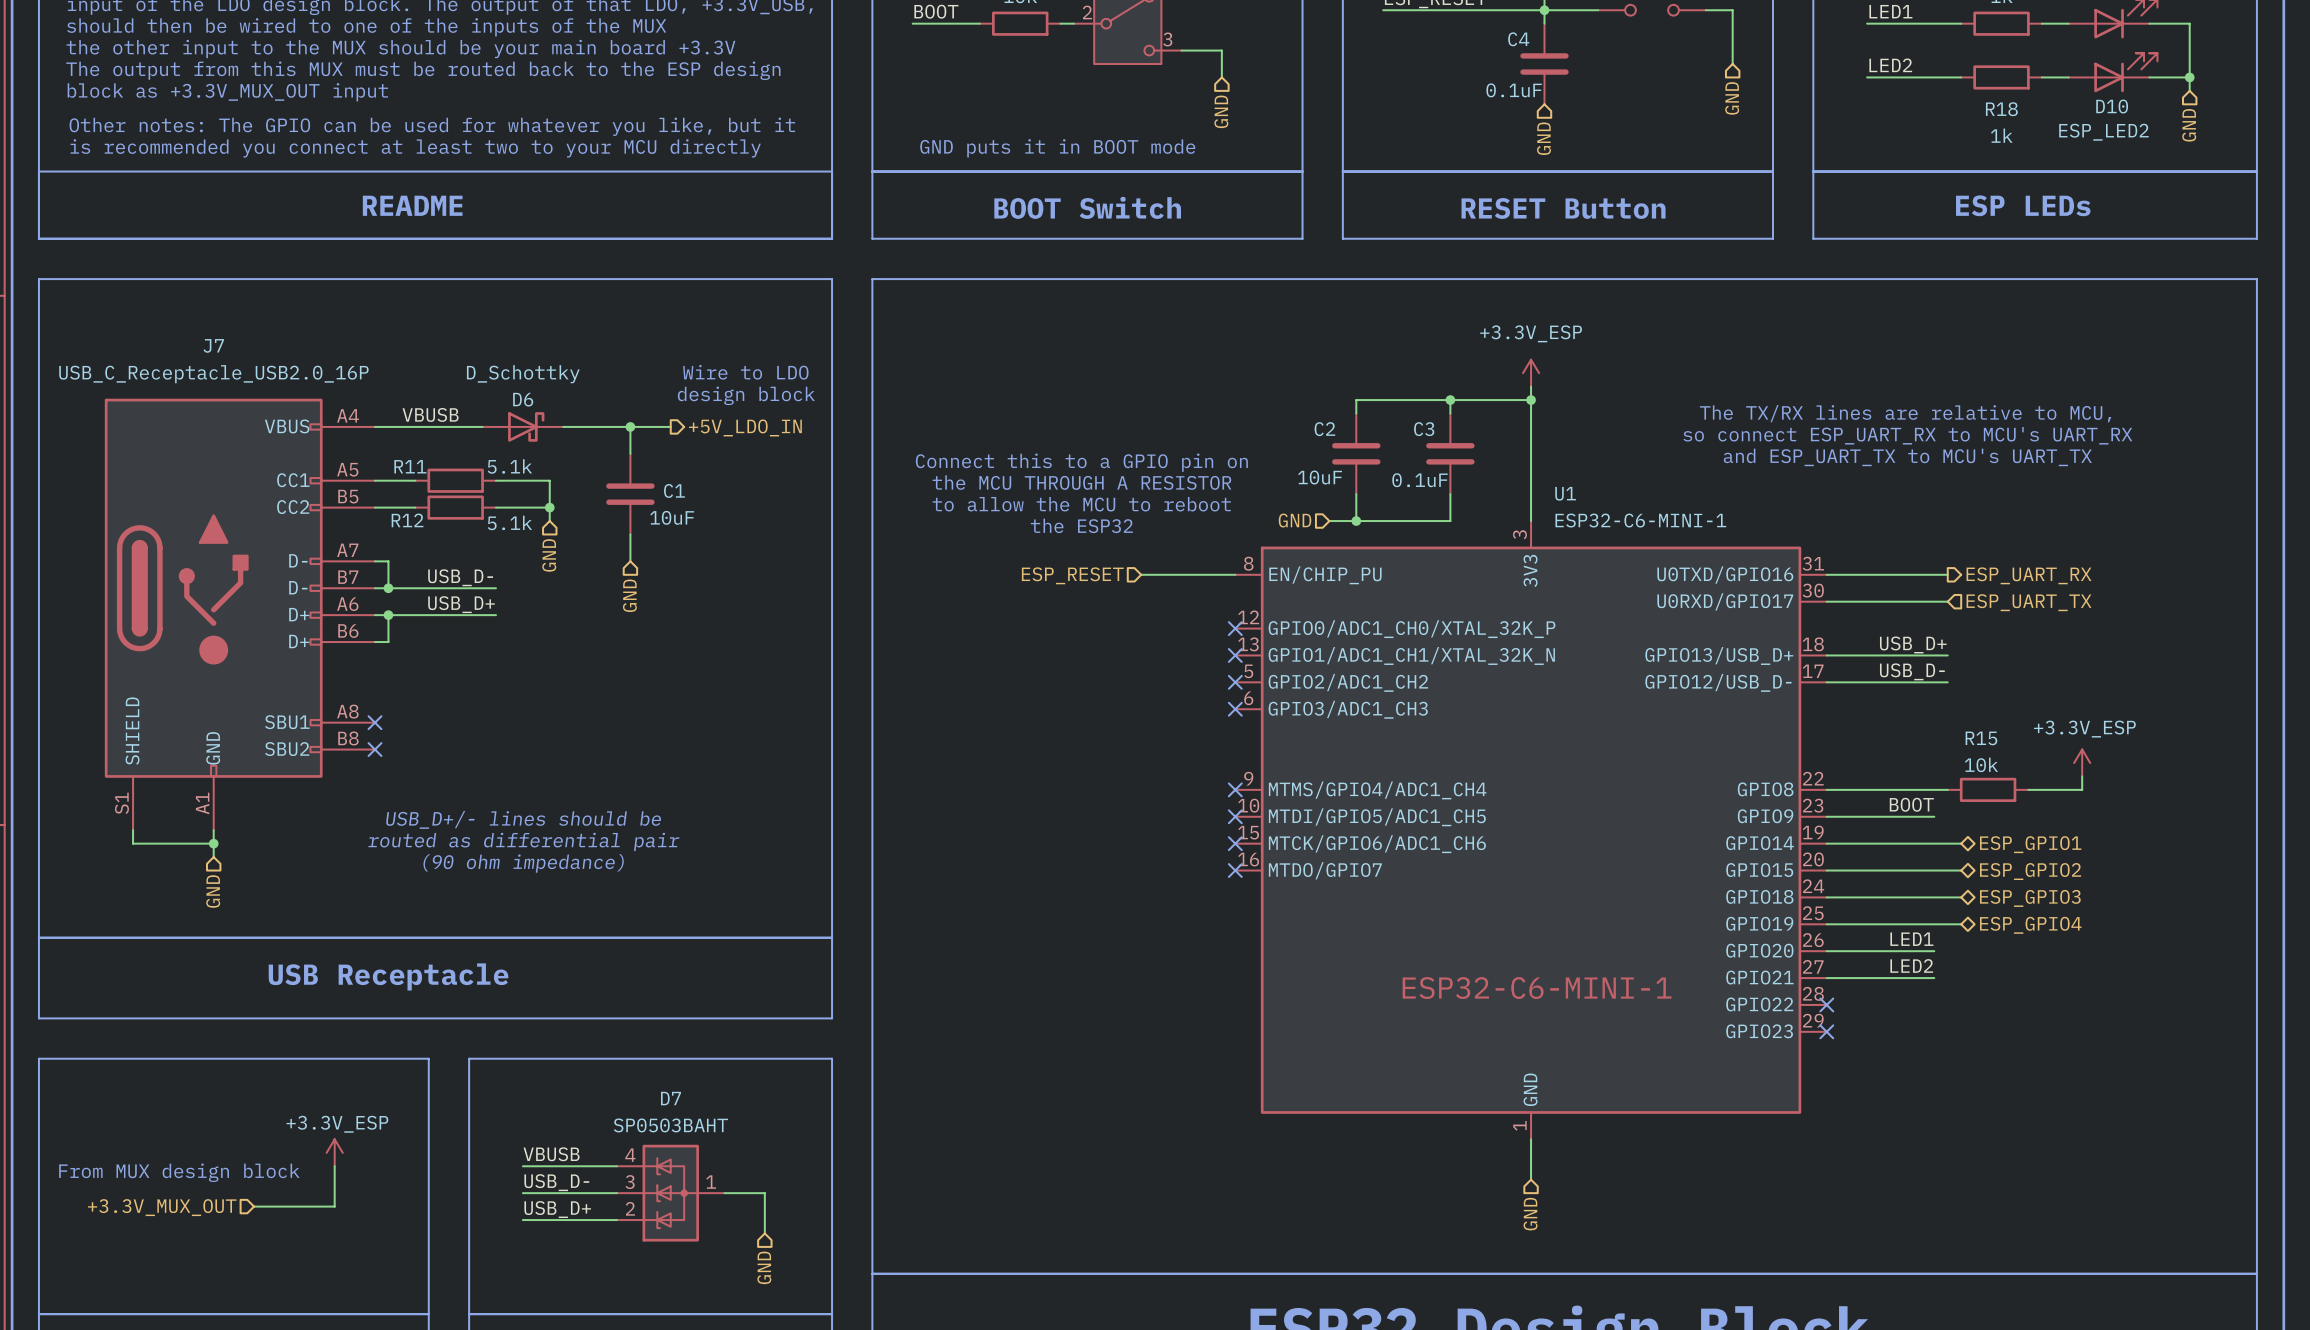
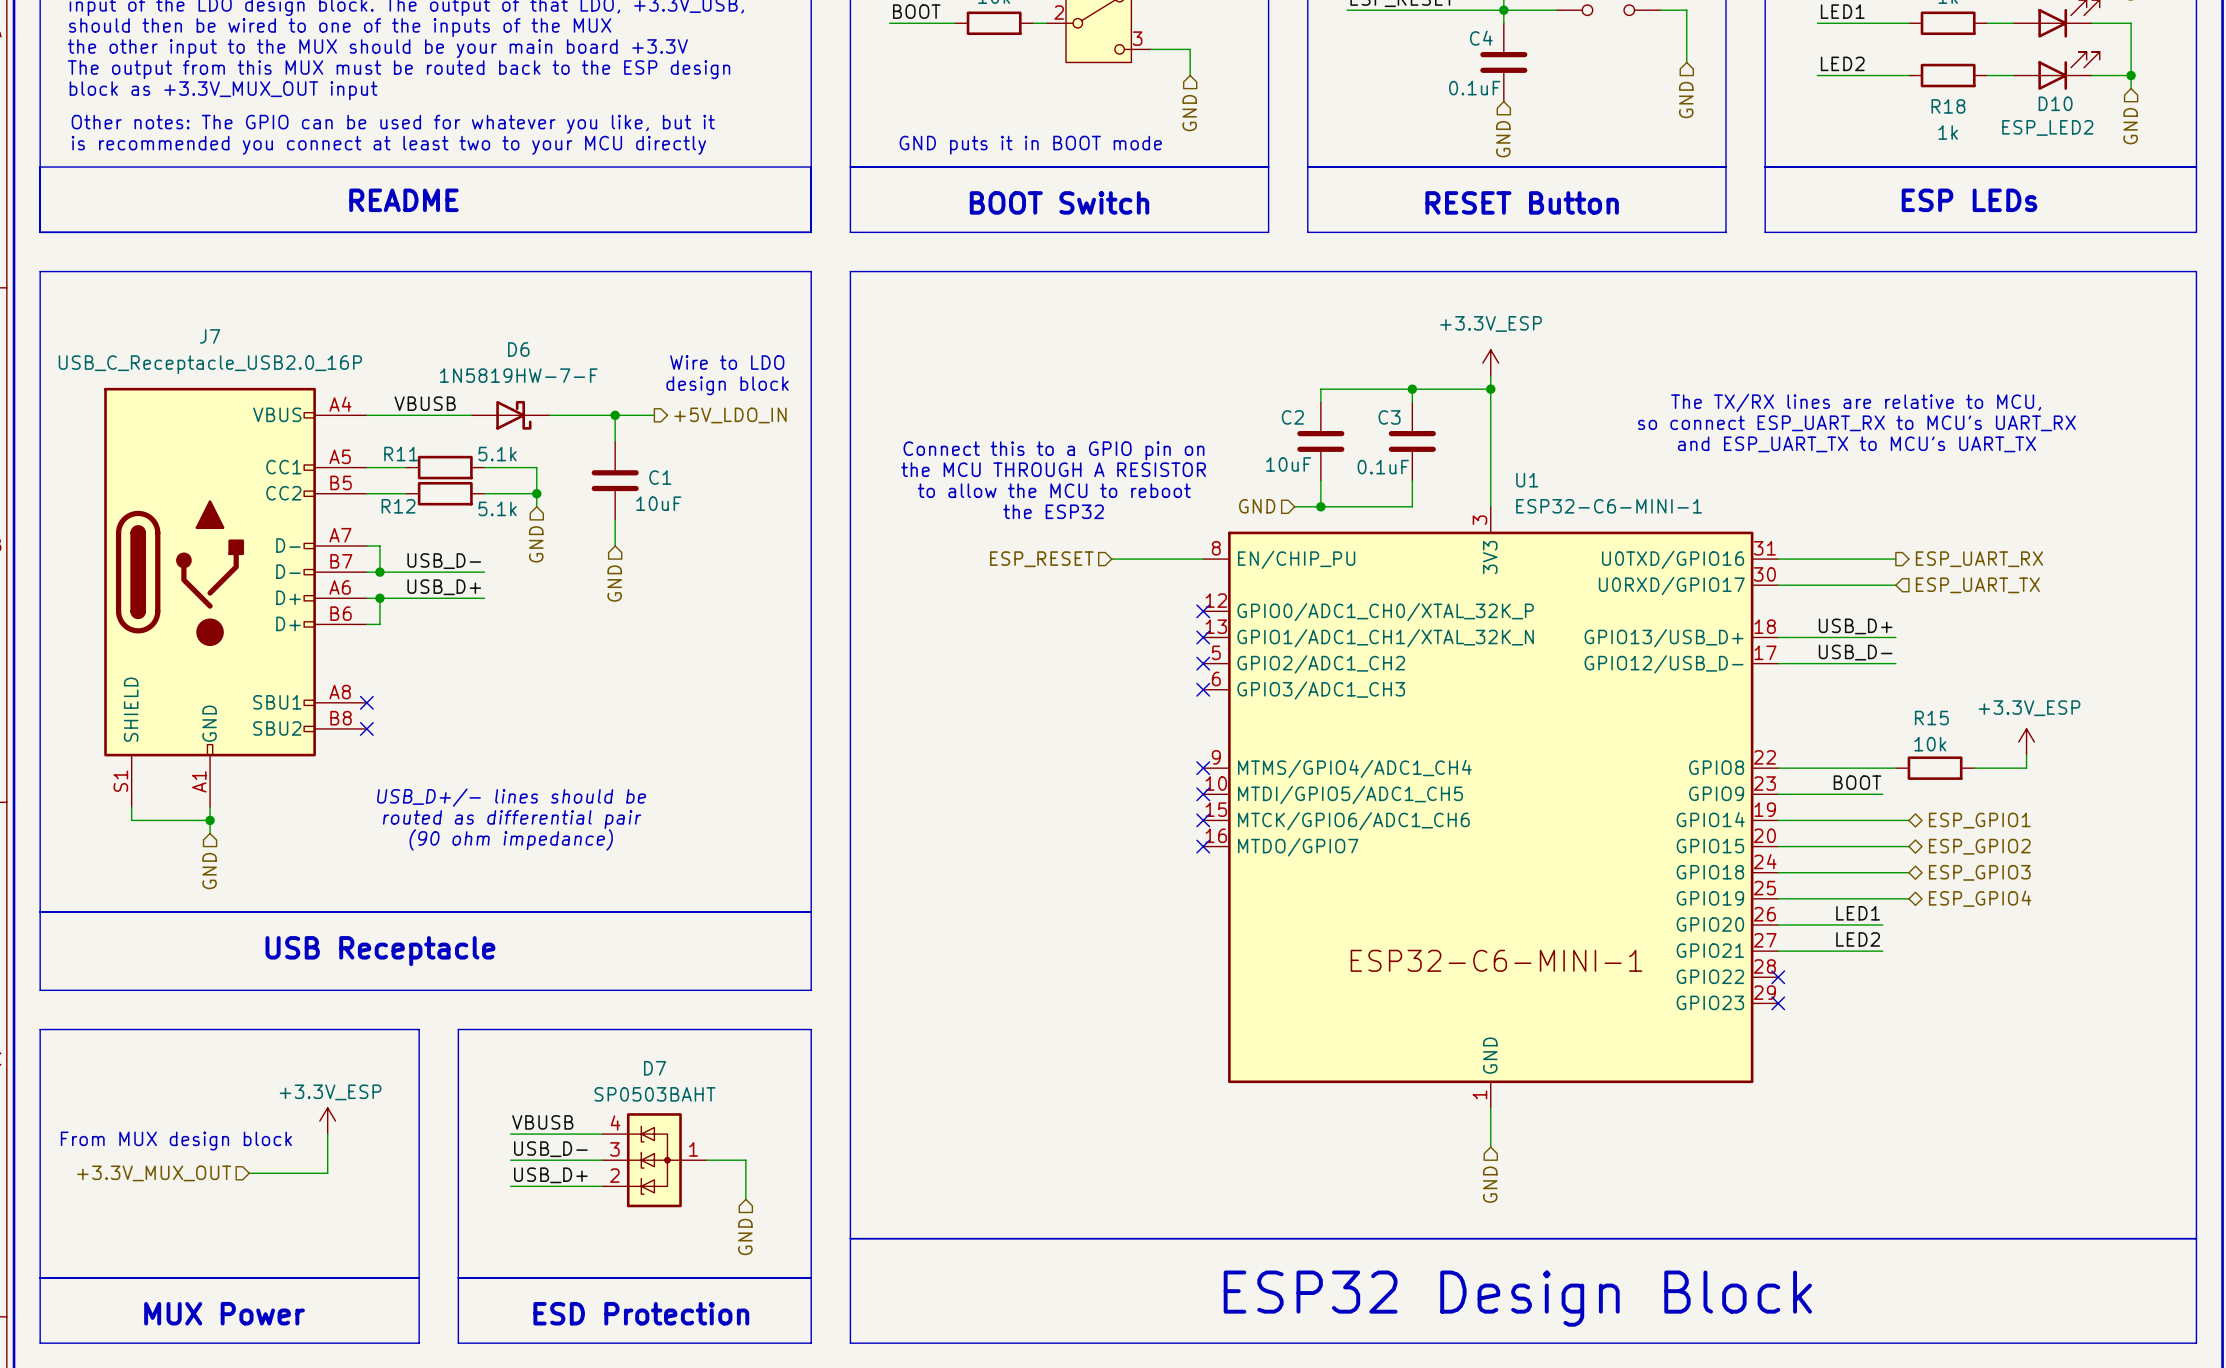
D6 value: D_Schottky (523, 374) -> 1N5819HW-7-F (518, 375)
D6 name position: D6 (523, 399) -> D6 (518, 349)
D6 flip: as is (526, 426) -> up-down (513, 415)

